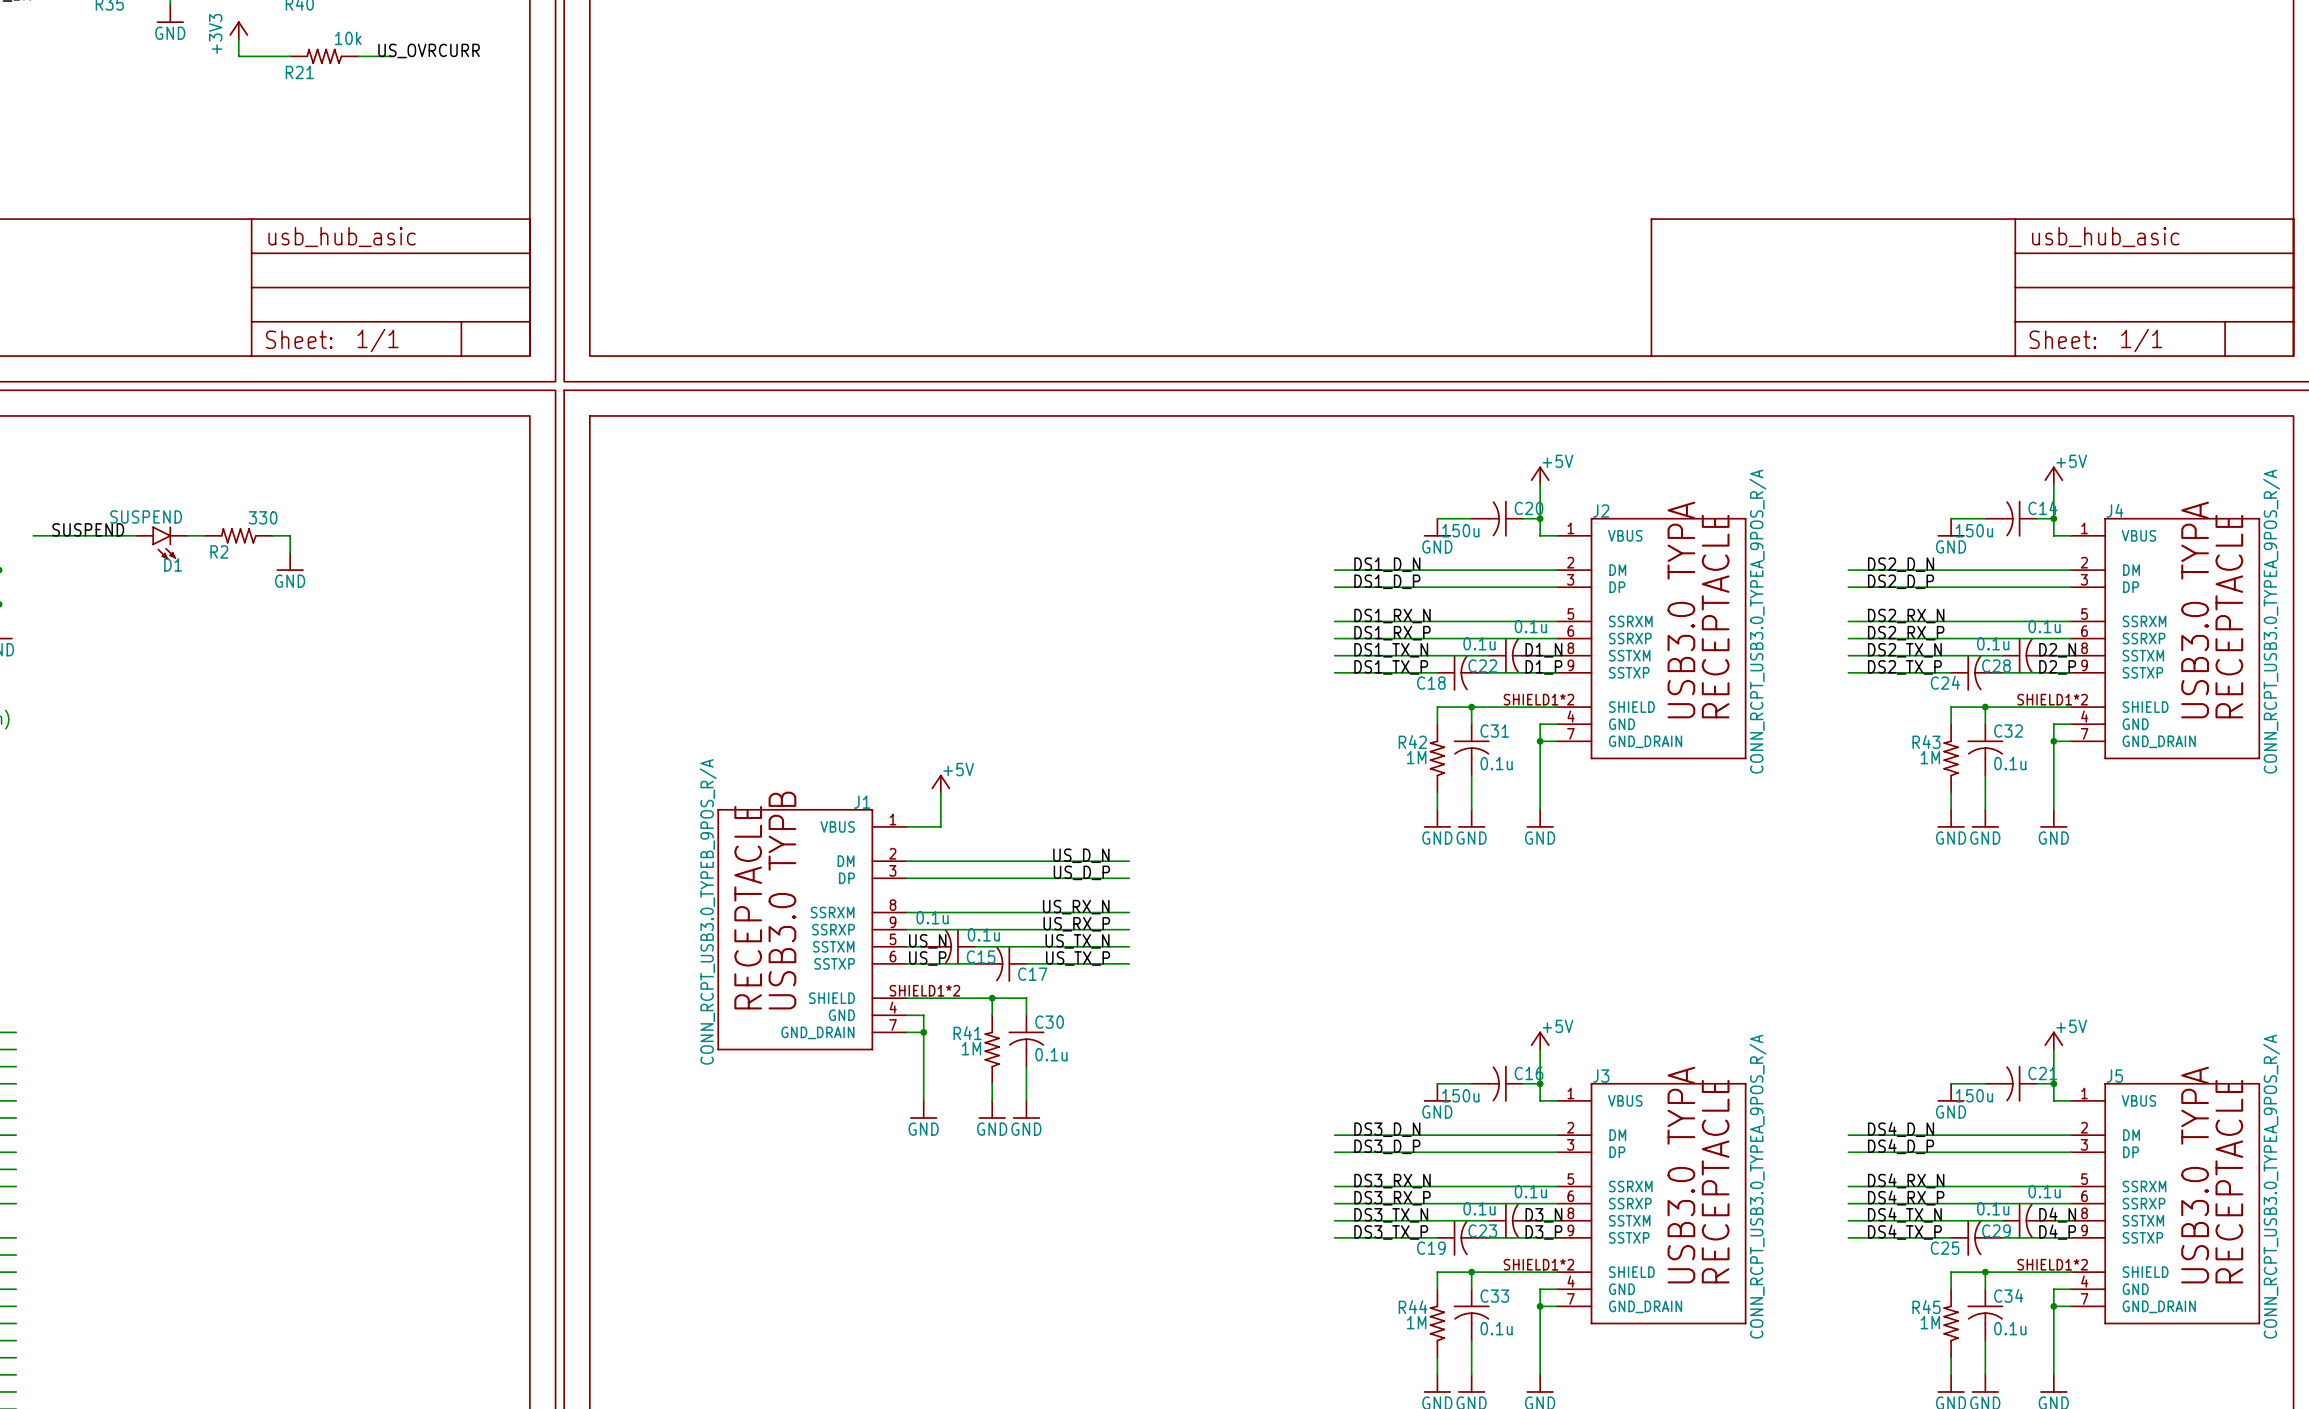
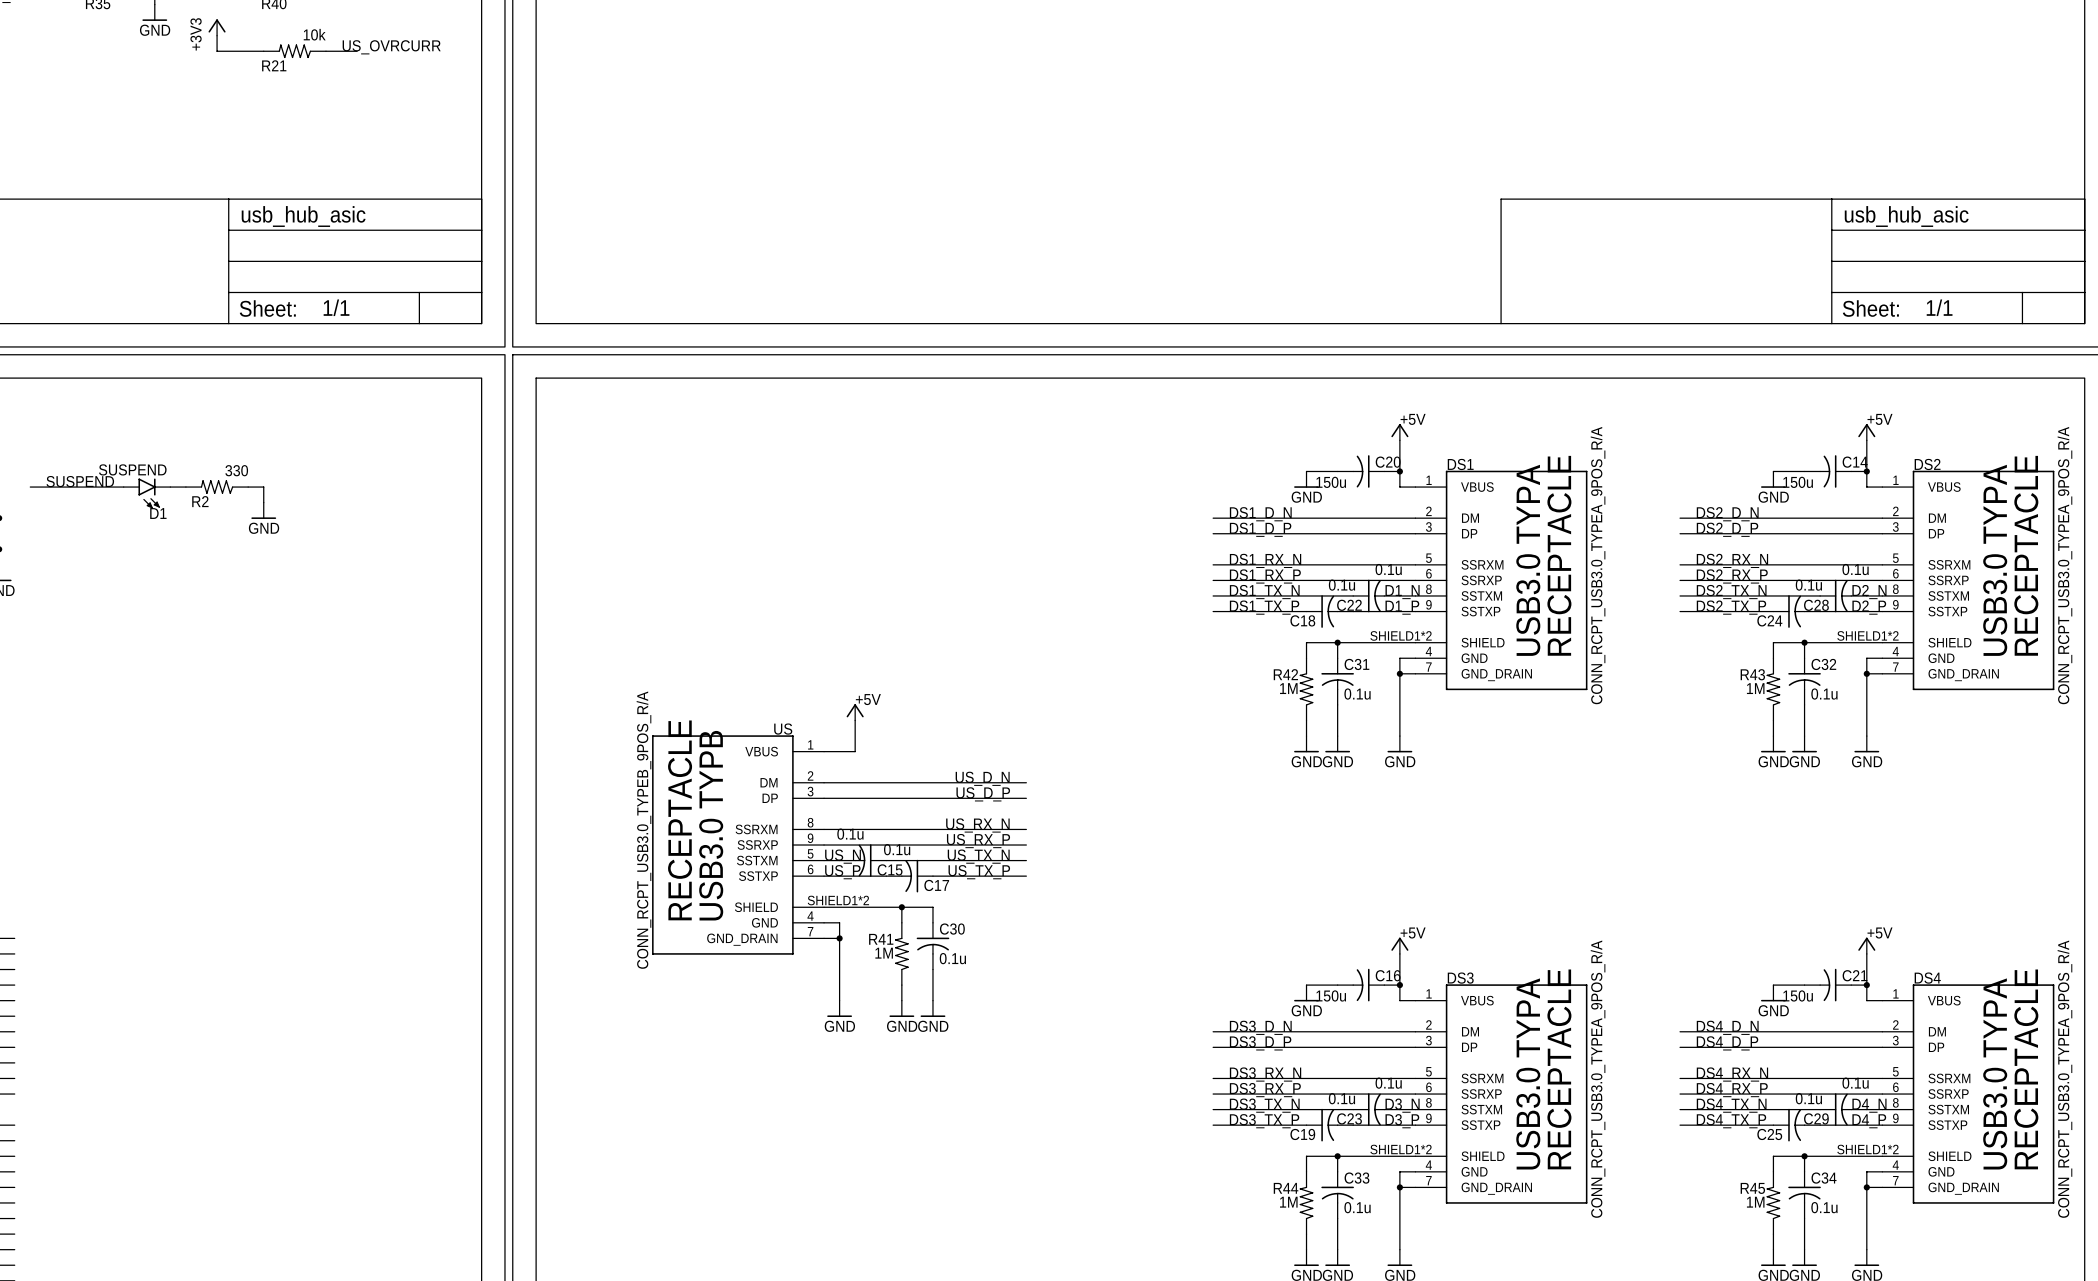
J4 name: J4 (2115, 510) -> DS2 (1927, 464)
J2 name: J2 (1601, 511) -> DS1 (1460, 464)
J1 name: J1 (862, 802) -> US (783, 729)
J3 name: J3 (1601, 1076) -> DS3 (1460, 978)
J5 name: J5 (2114, 1076) -> DS4 (1927, 978)

